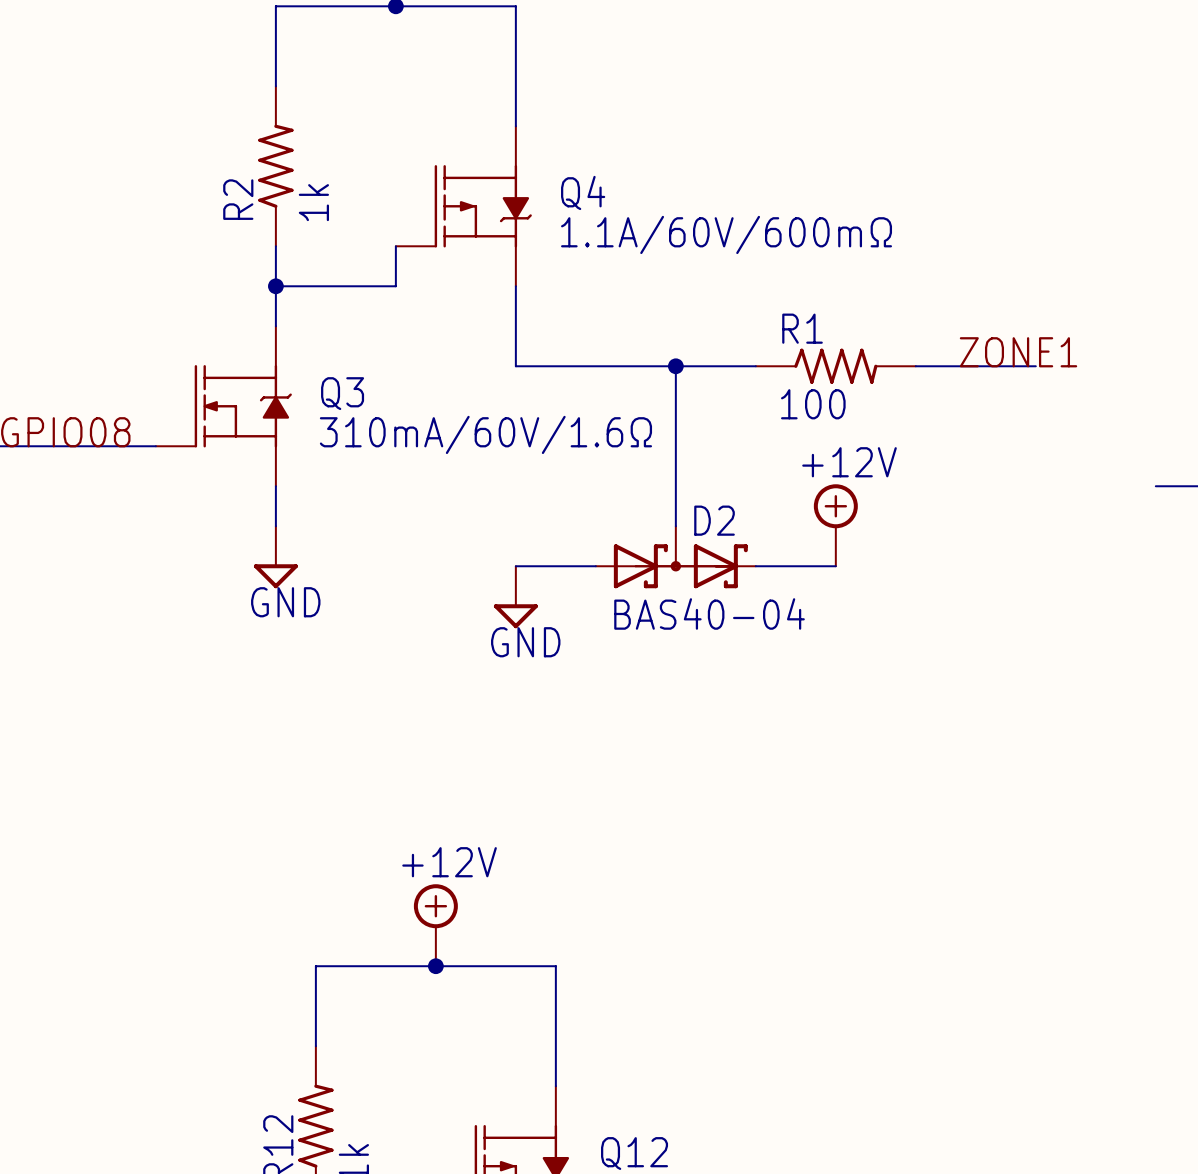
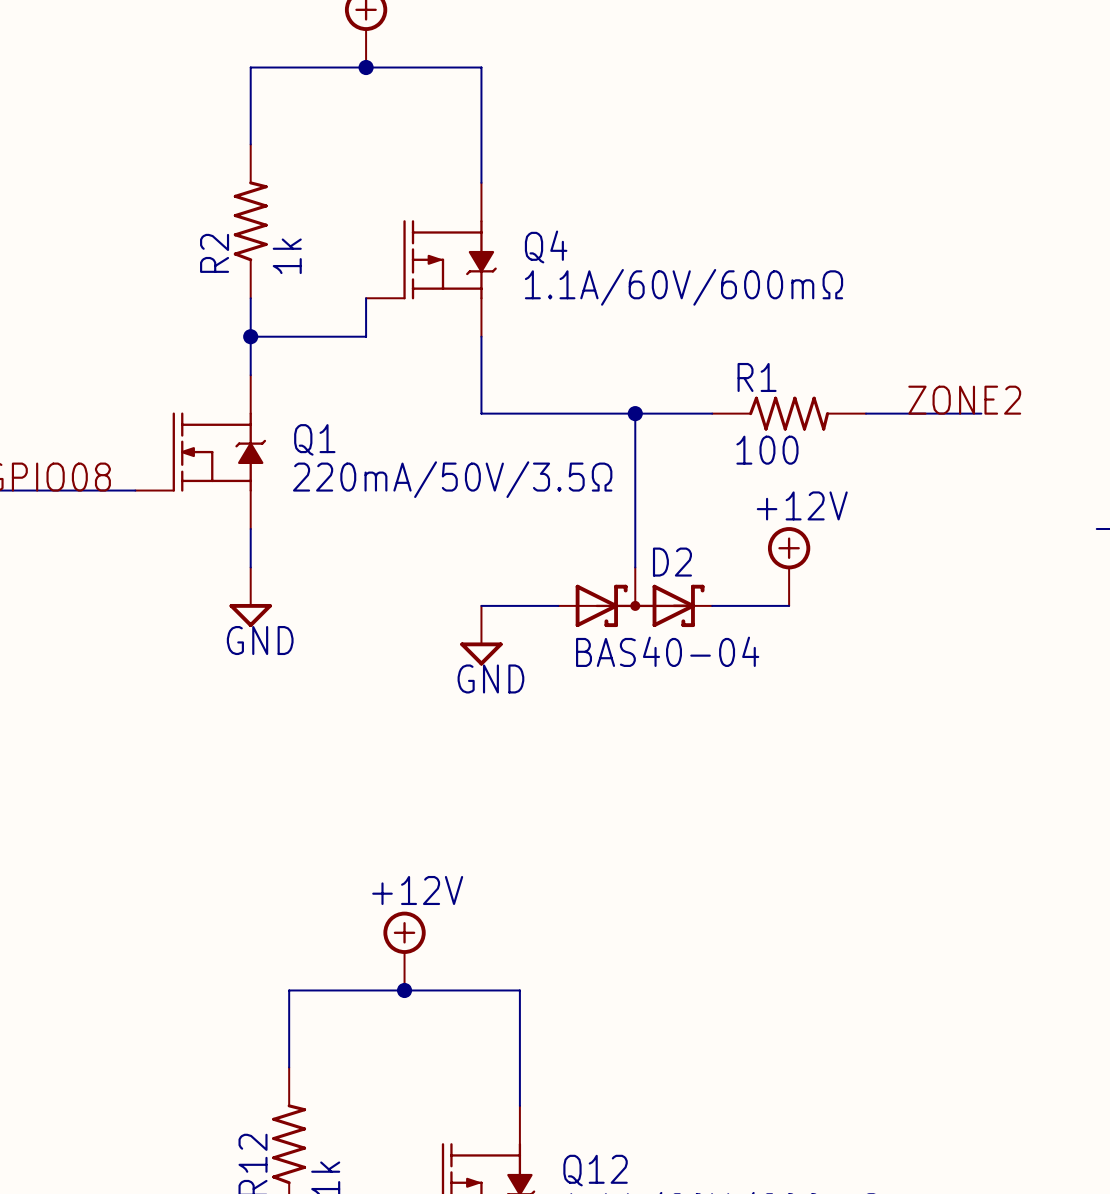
label: ZONE1 (1018, 352) -> ZONE2 (964, 400)
Q3 name: Q3 (342, 393) -> Q1 (314, 439)
Q3 value: 310mA/60V/1.6Ω (485, 434) -> 220mA/50V/3.5Ω (452, 479)

